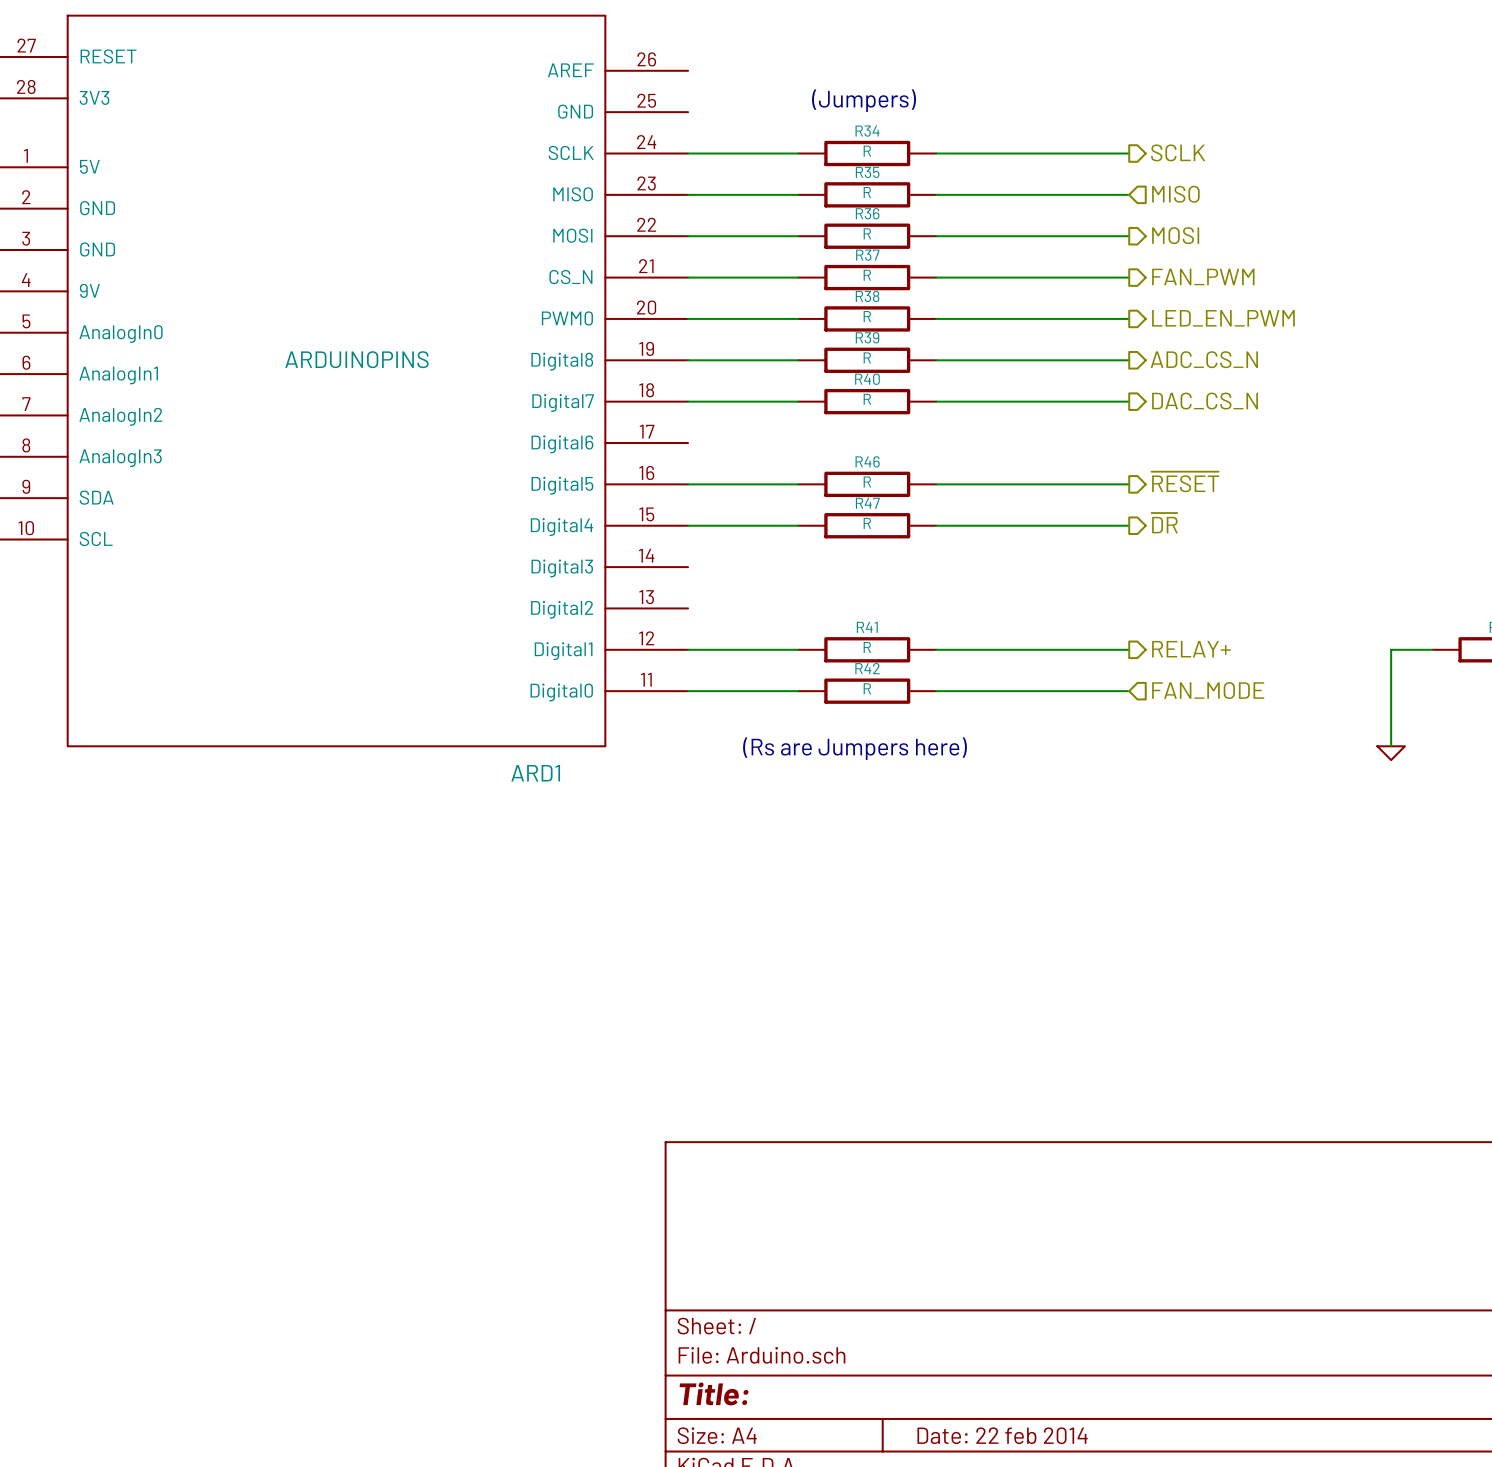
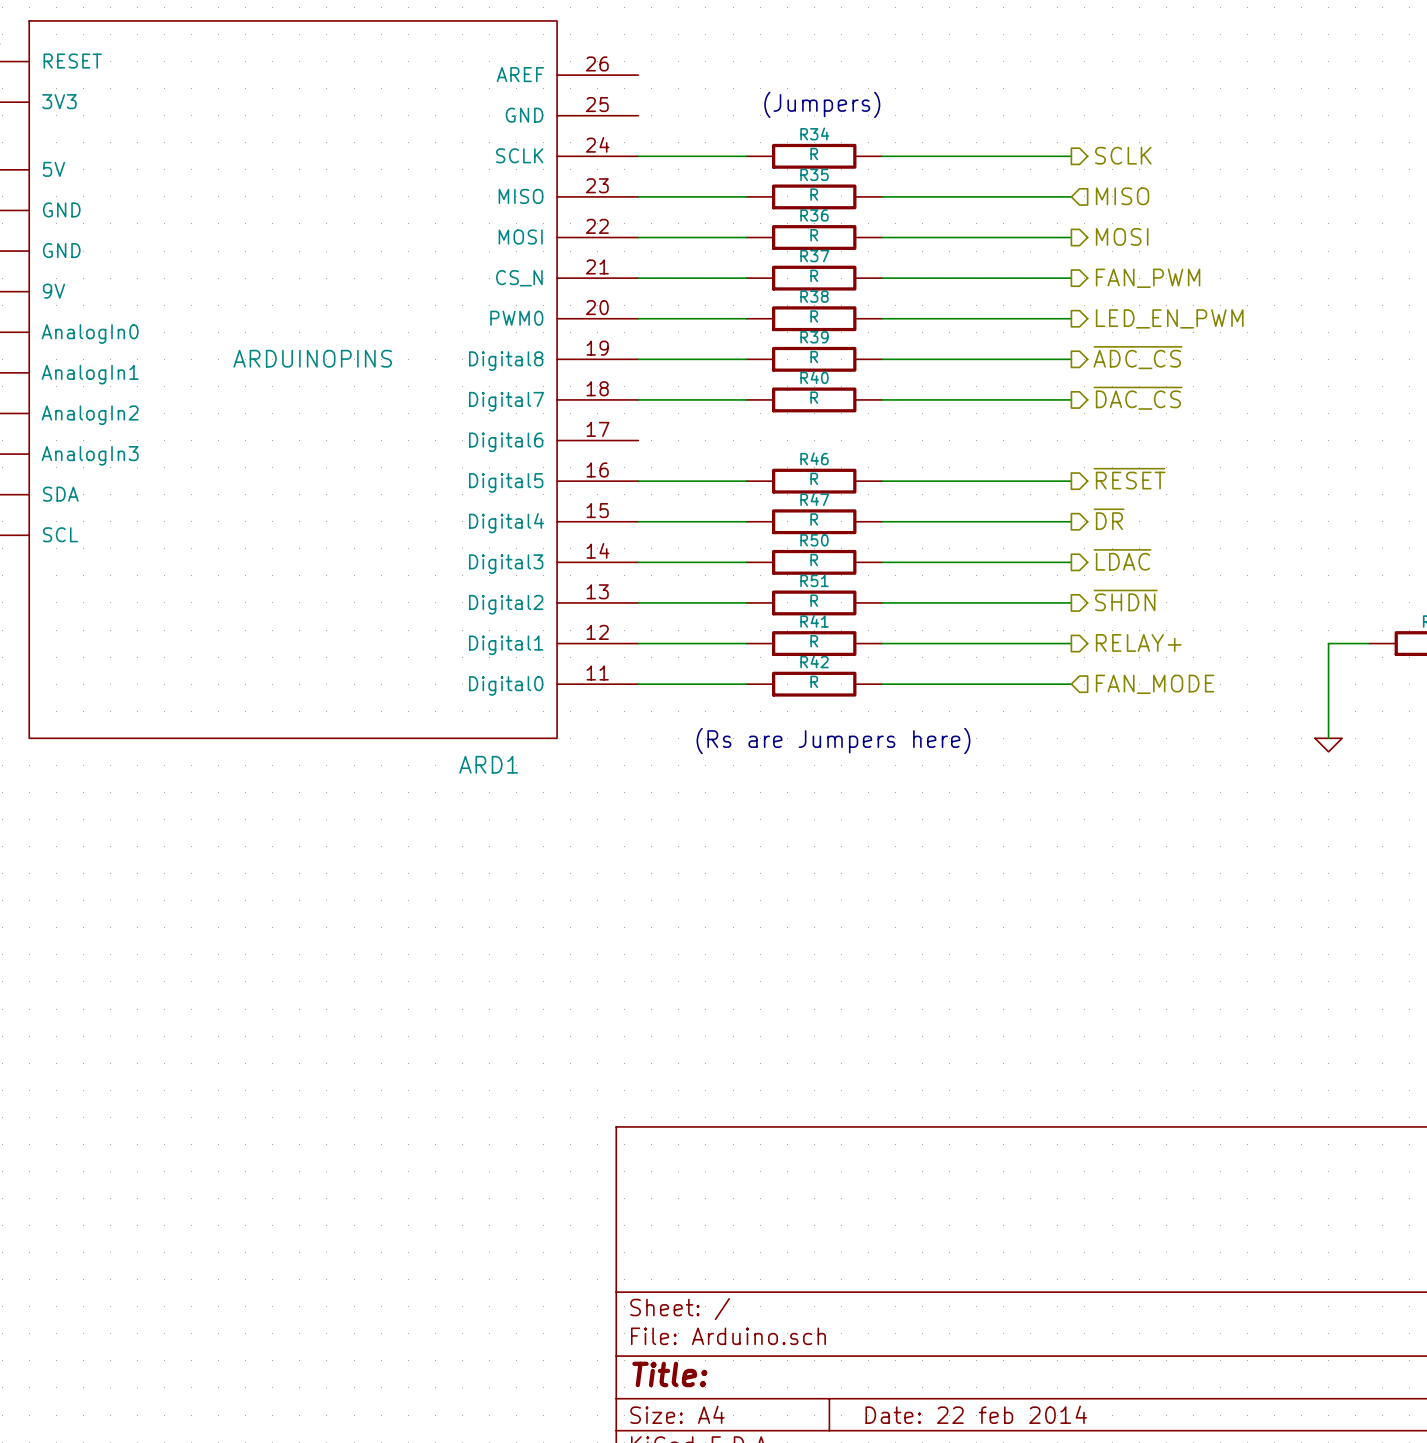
hierarchical label: ADC_CS_N (1204, 359) -> ~{ADC_CS} (1137, 357)
hierarchical label: DAC_CS_N (1205, 401) -> ~{DAC_CS} (1138, 398)
hierarchical label: none -> ~{LDAC} (1122, 559)
wire: none -> (638, 562) (746, 562)
R50: none -> R (814, 562)
wire: none -> (881, 562) (1071, 562)
hierarchical label: none -> ~{SHDN} (1125, 600)
wire: none -> (638, 602) (746, 602)
R51: none -> R (814, 602)
wire: none -> (881, 602) (1071, 602)

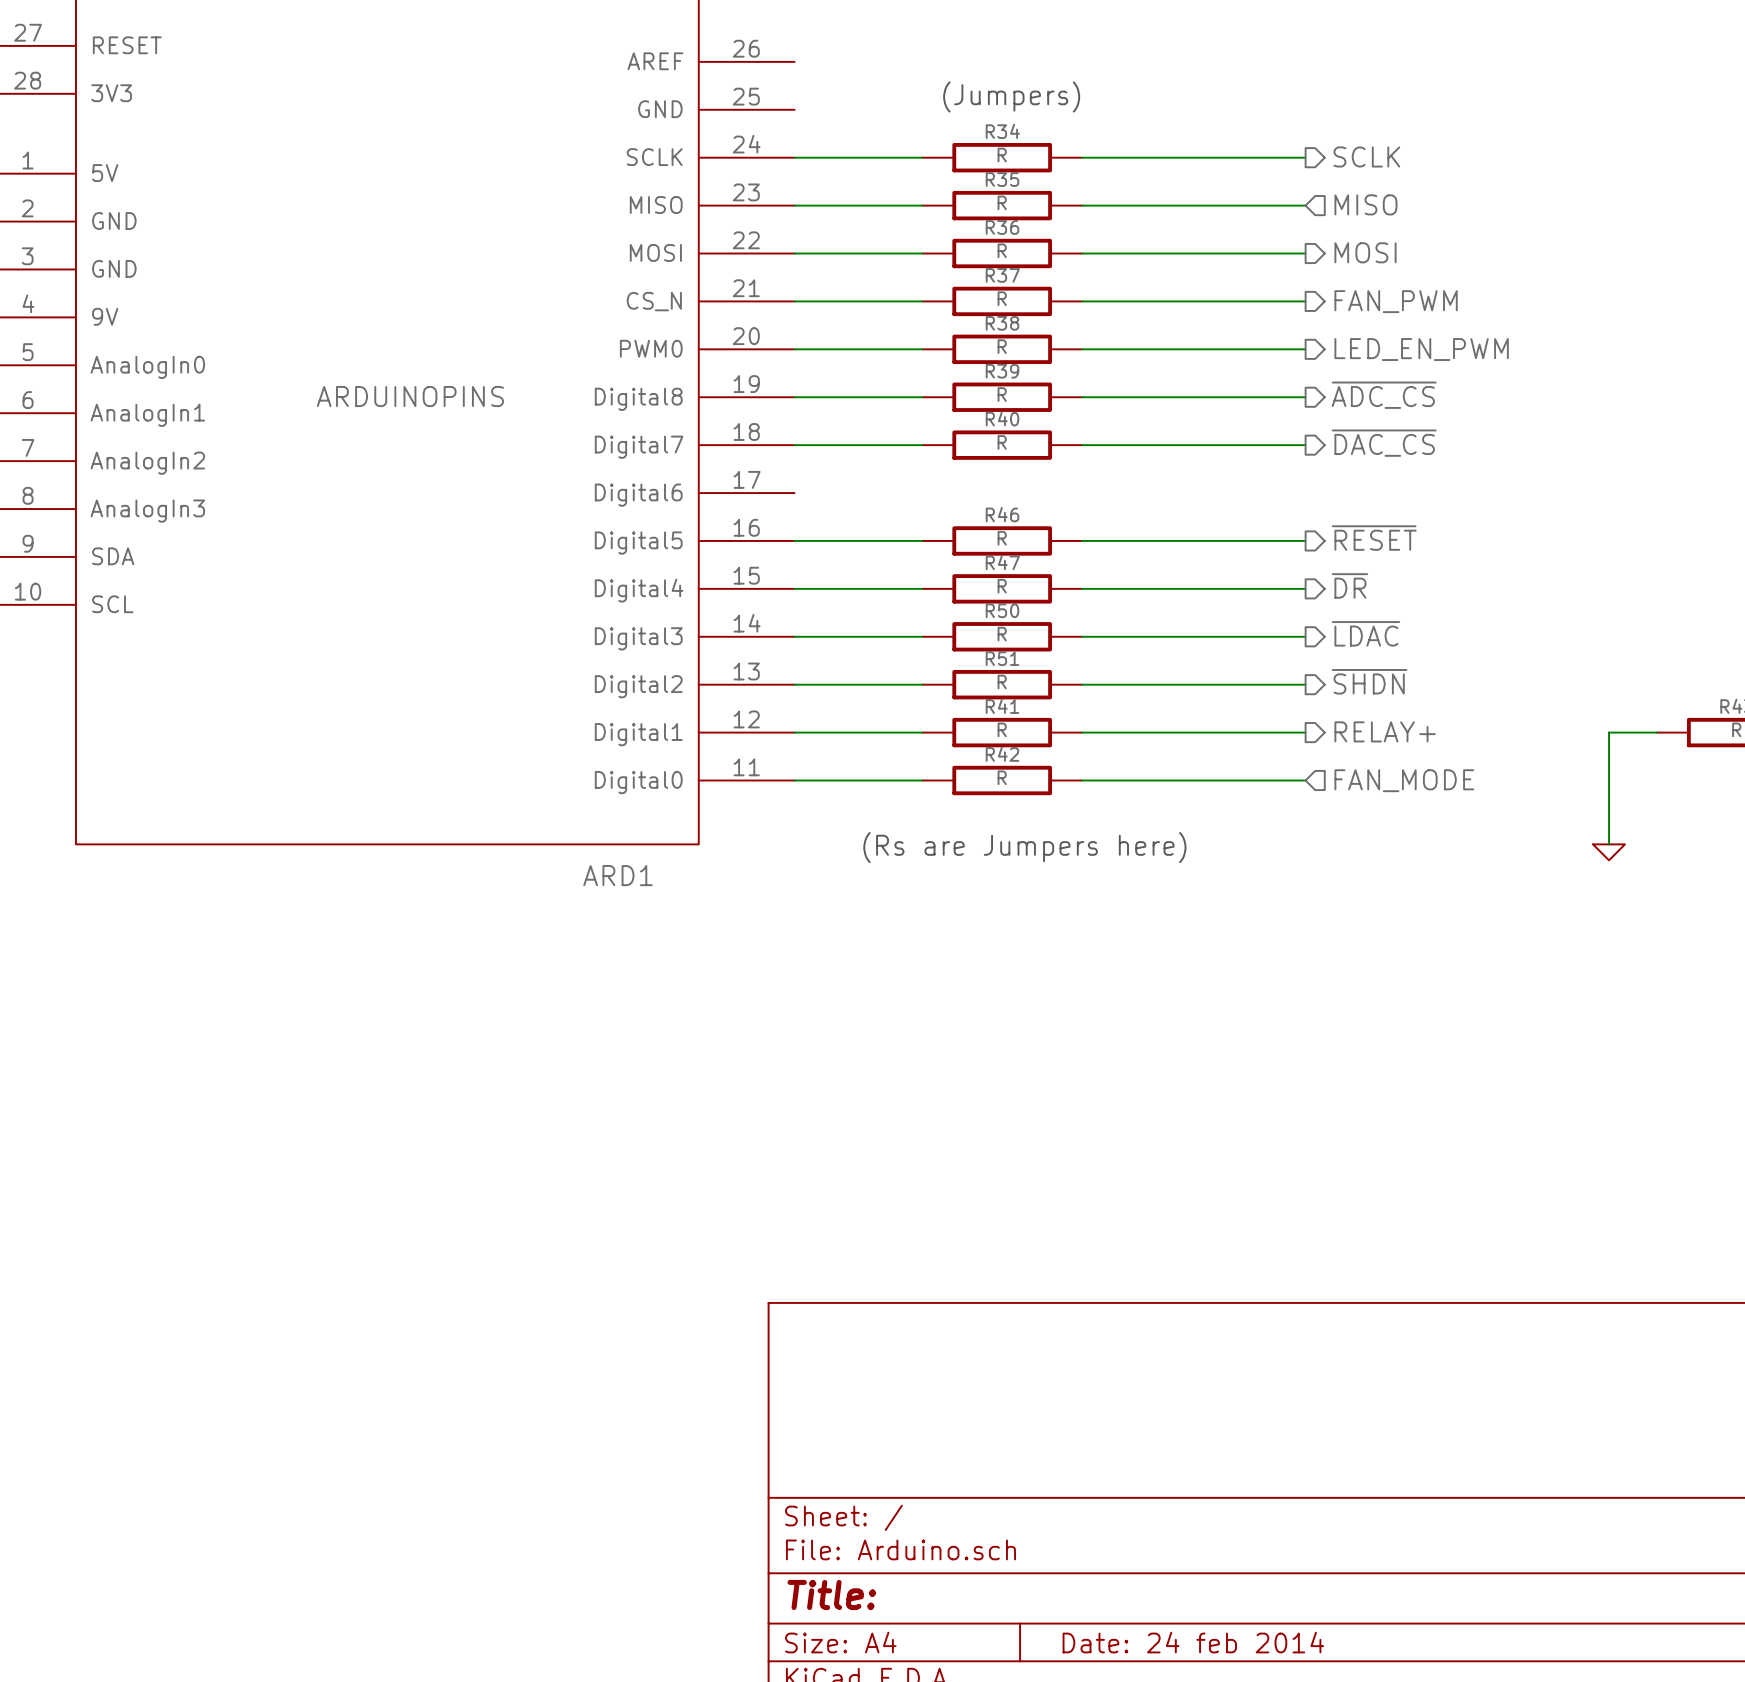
title block: Date: 22 feb 2014 (976, 1414) -> Date: 24 feb 2014 (1193, 1642)

